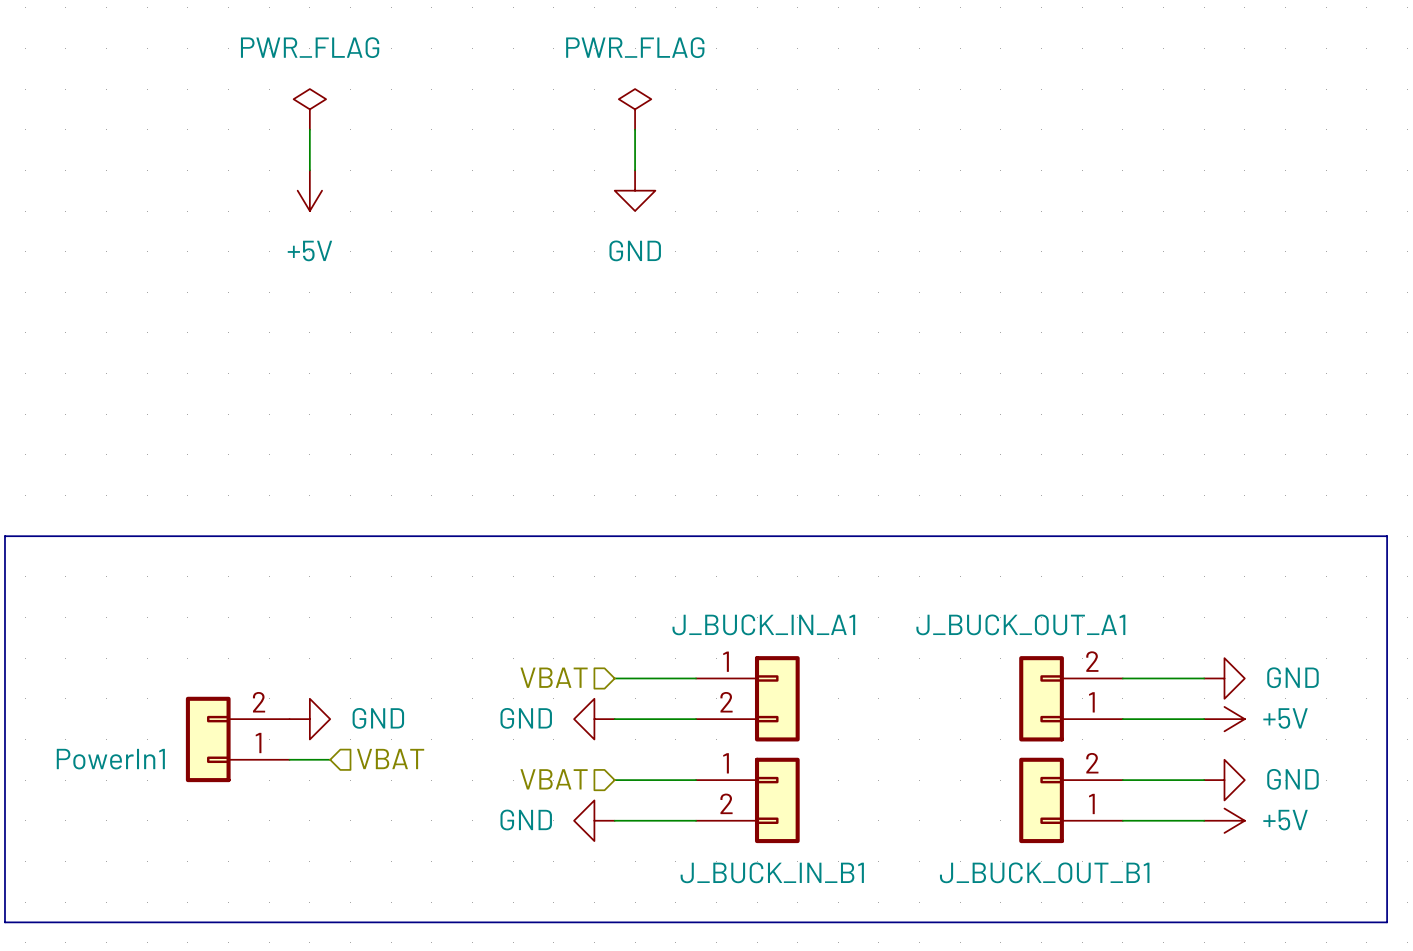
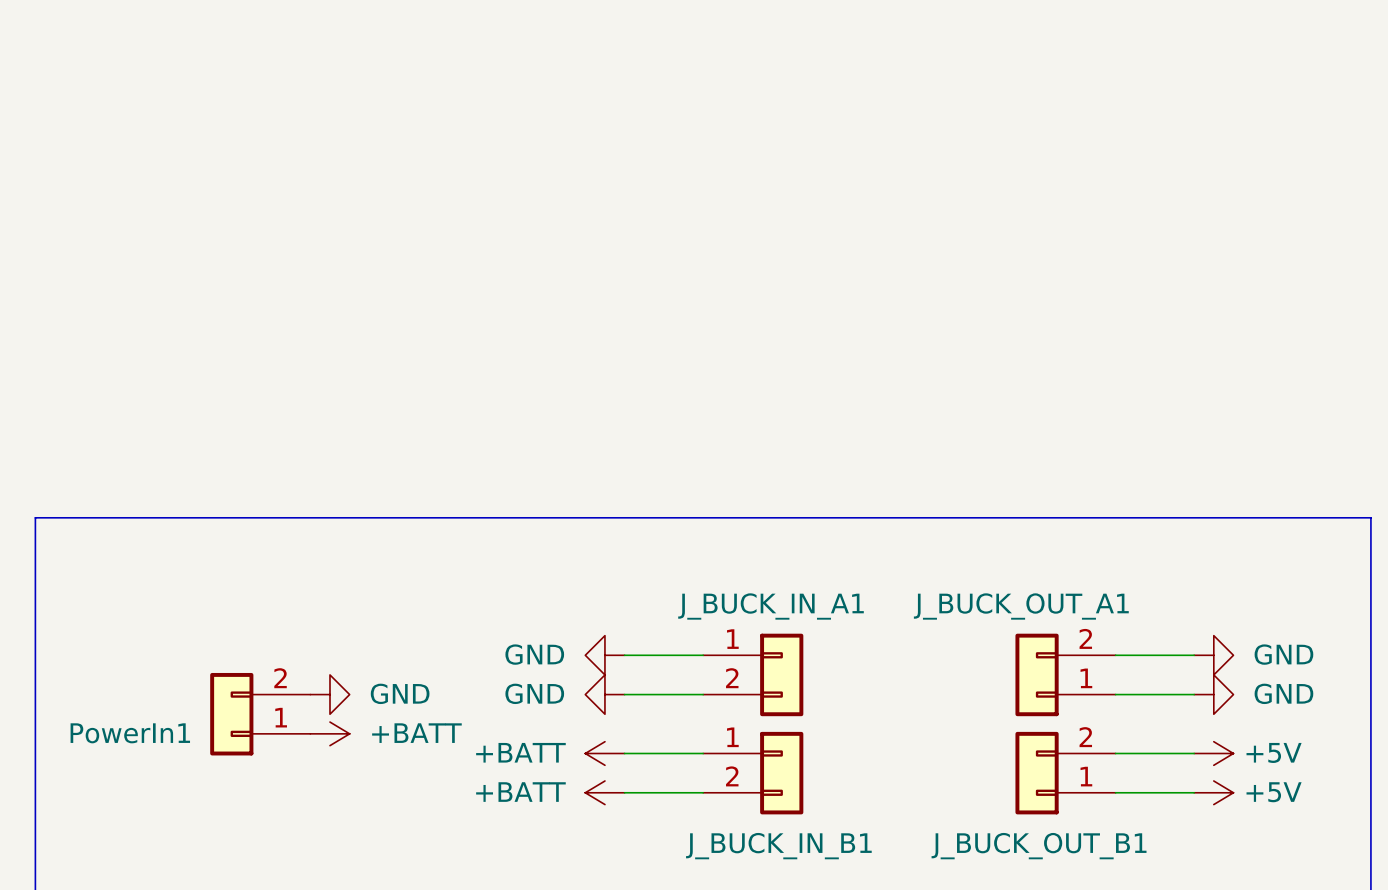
power symbol: PWR_FLAG (309, 109) -> none
power symbol: PWR_FLAG (635, 109) -> none
wire: (309, 129) (309, 170) -> none
wire: (635, 129) (635, 170) -> none
power symbol: +5V (309, 190) -> none
power symbol: GND (635, 190) -> none
hierarchical label: VBAT (554, 677) -> none
power symbol: none -> GND (604, 655)
power symbol: +5V (1224, 719) -> GND (1213, 694)
power symbol: none -> +BATT (329, 733)
hierarchical label: VBAT (390, 759) -> none
hierarchical label: VBAT (554, 779) -> none
power symbol: none -> +BATT (604, 753)
power symbol: GND (1224, 780) -> +5V (1213, 753)
power symbol: GND (594, 820) -> +BATT (604, 792)

